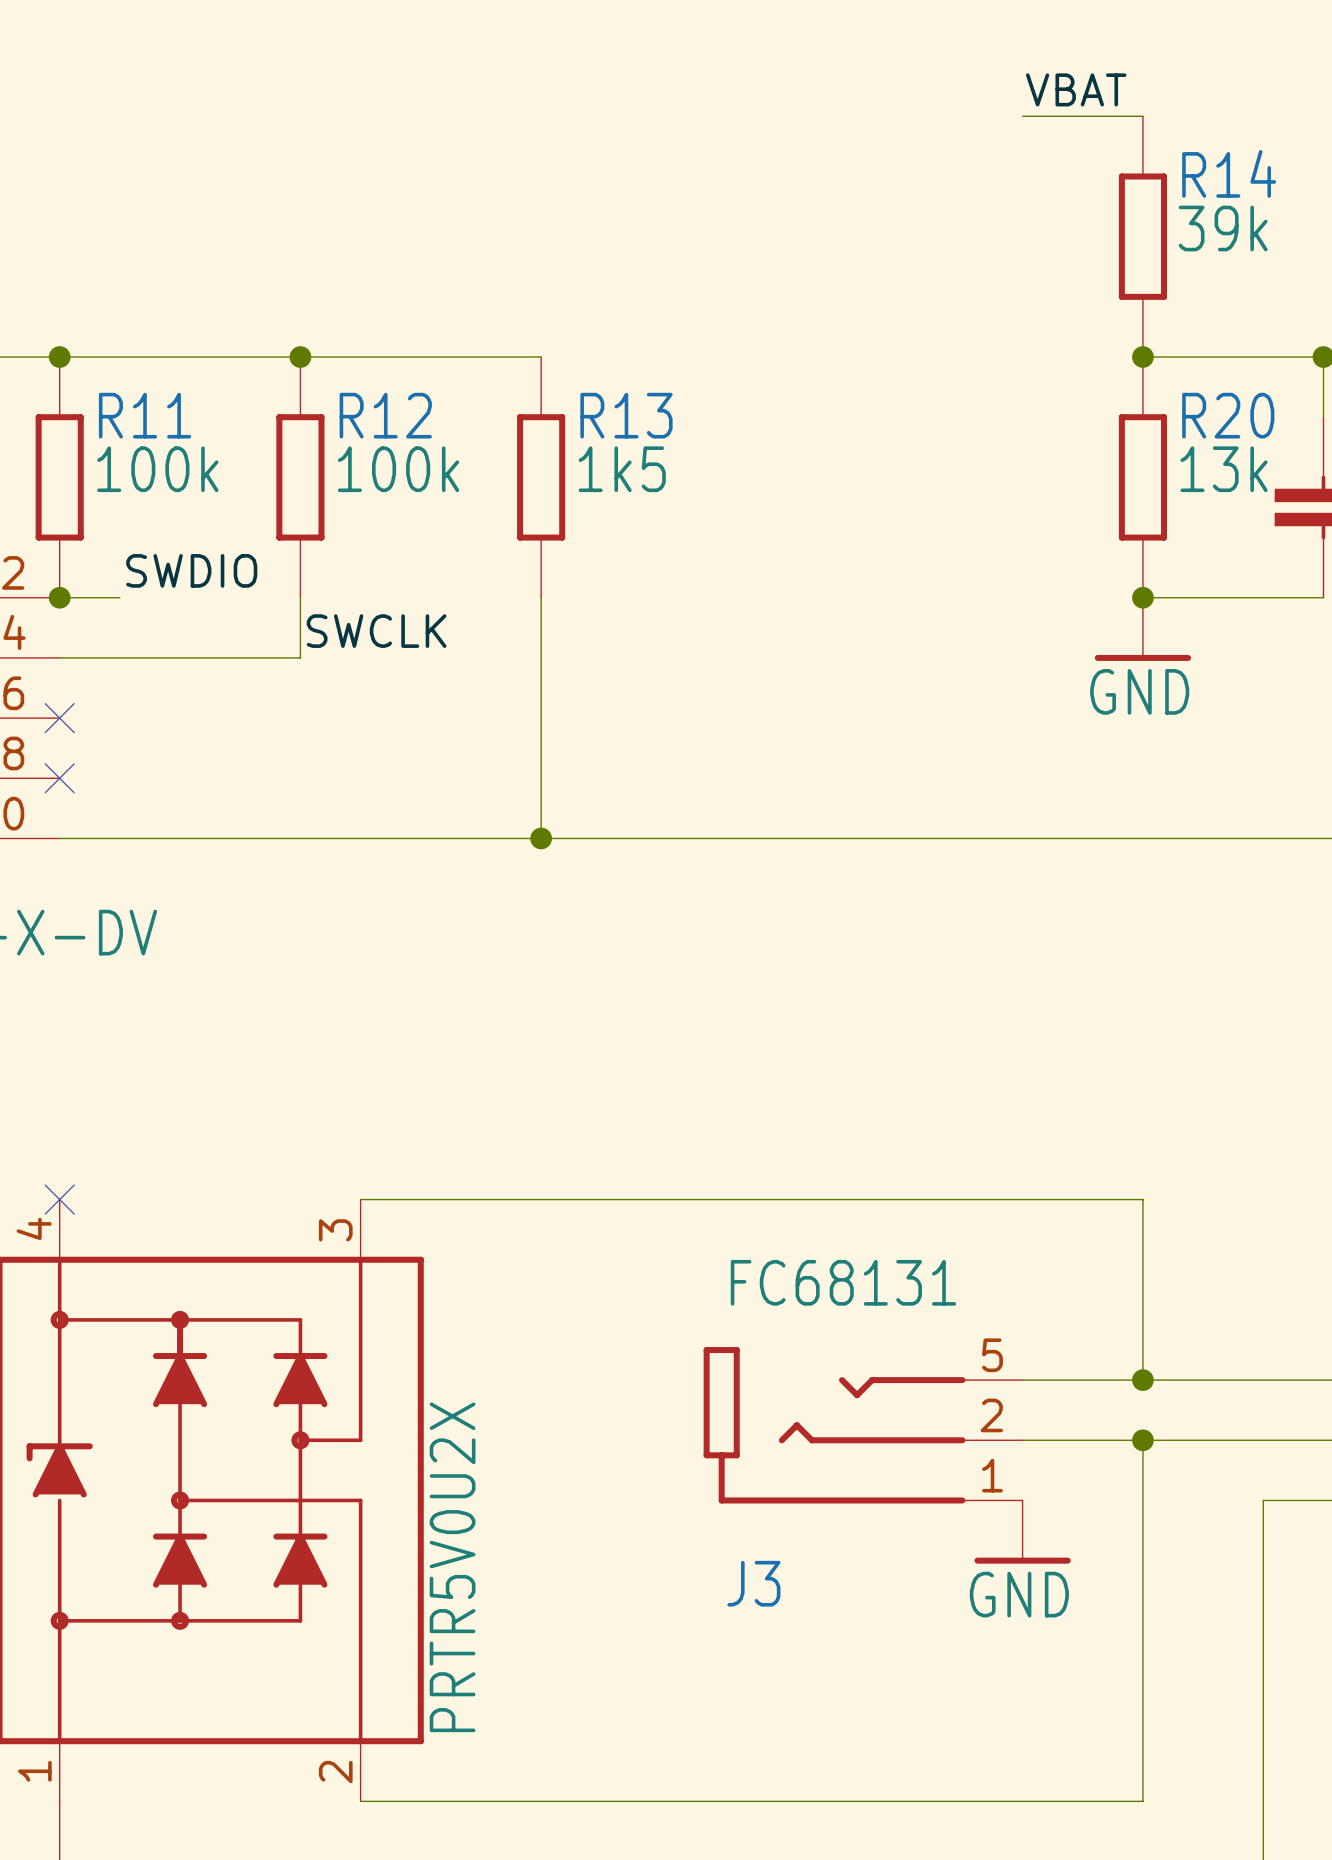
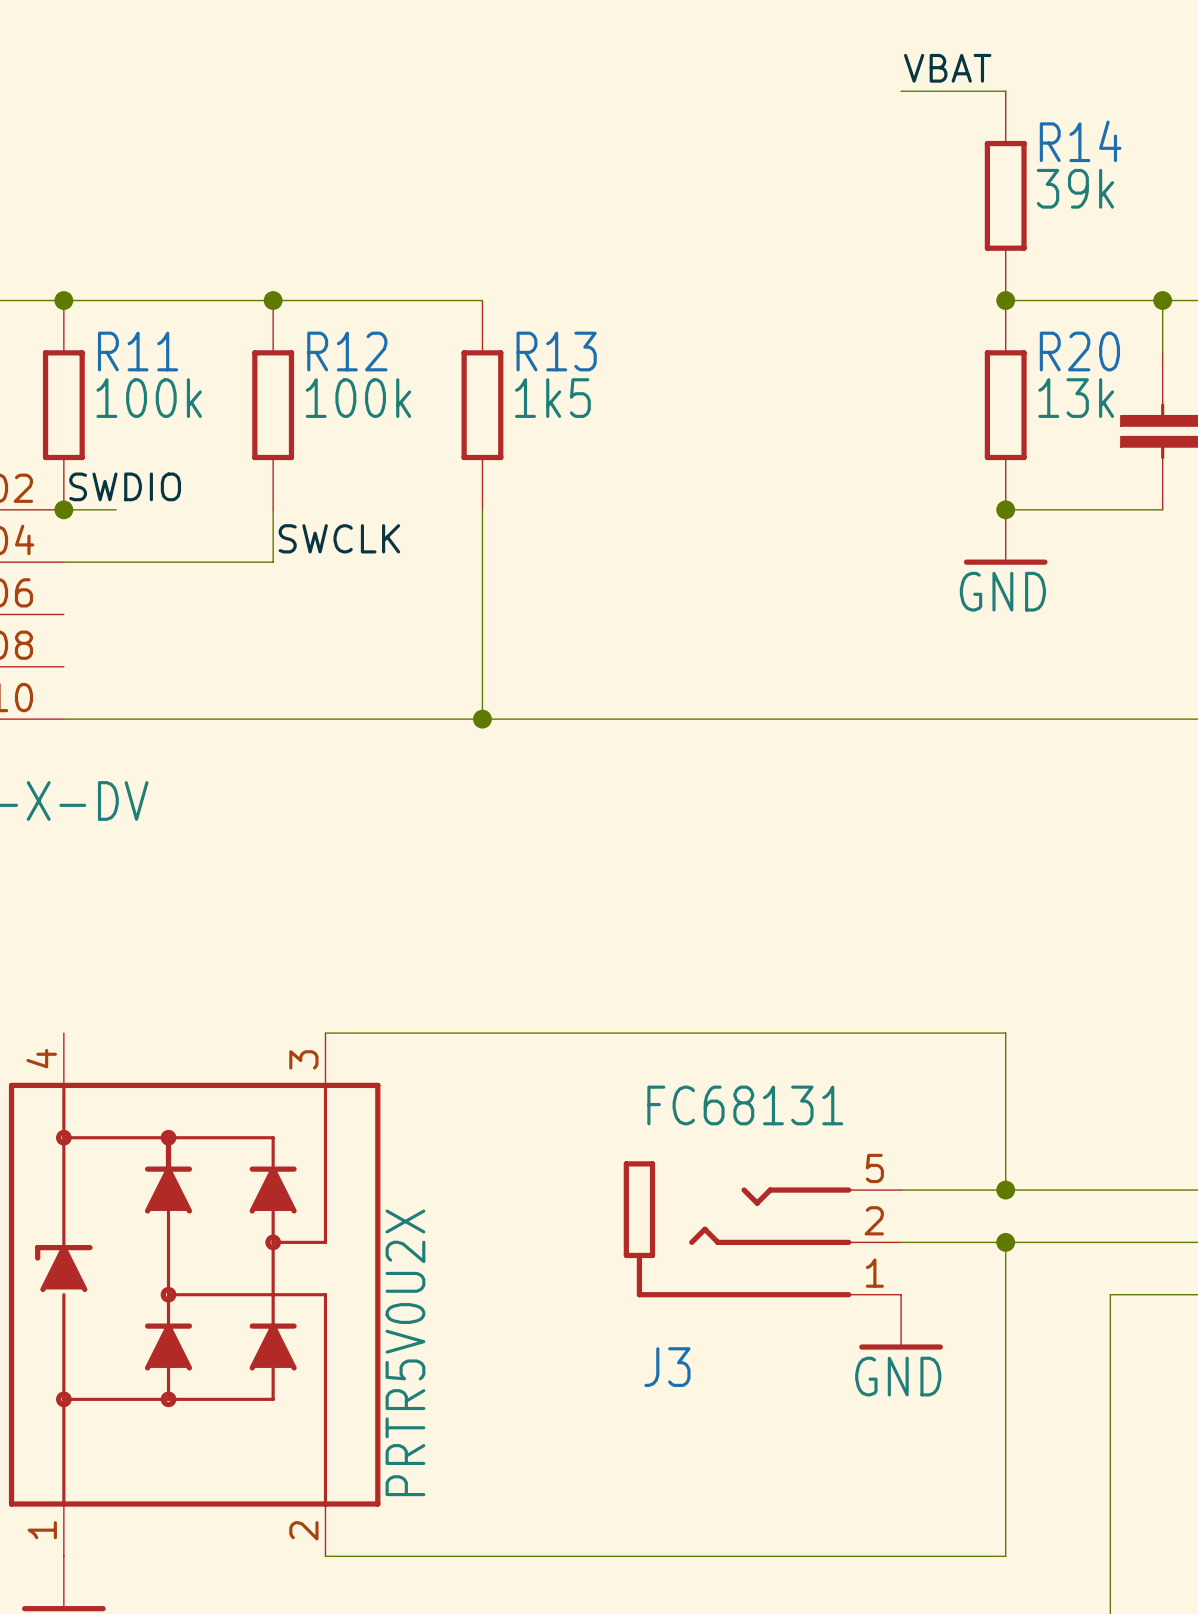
label position: SWDIO (191, 570) -> SWDIO (125, 486)
no-connect mark: (59, 718) -> none
no-connect mark: (59, 778) -> none
no-connect mark: (59, 1199) -> none

